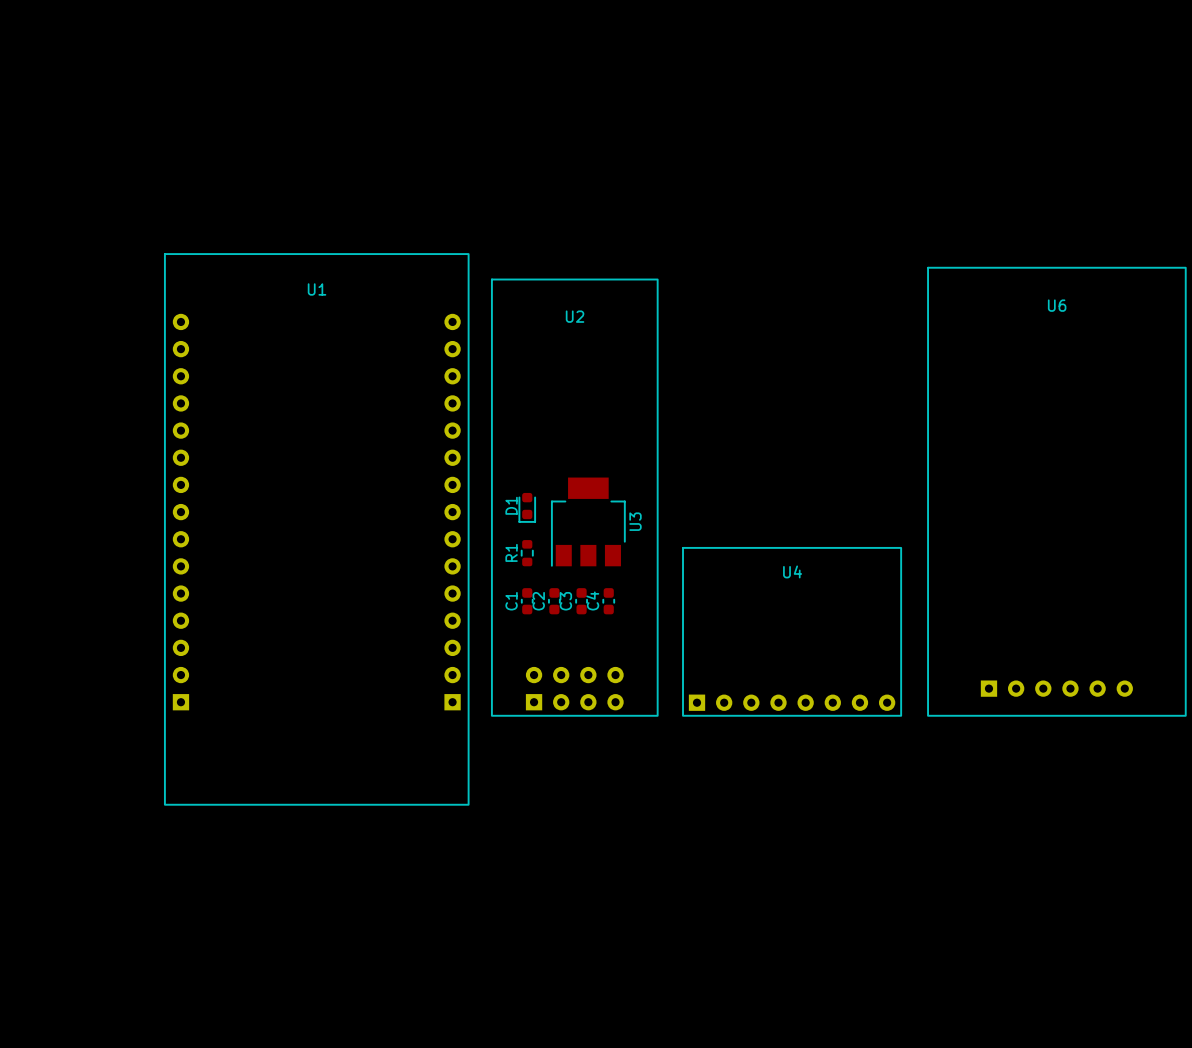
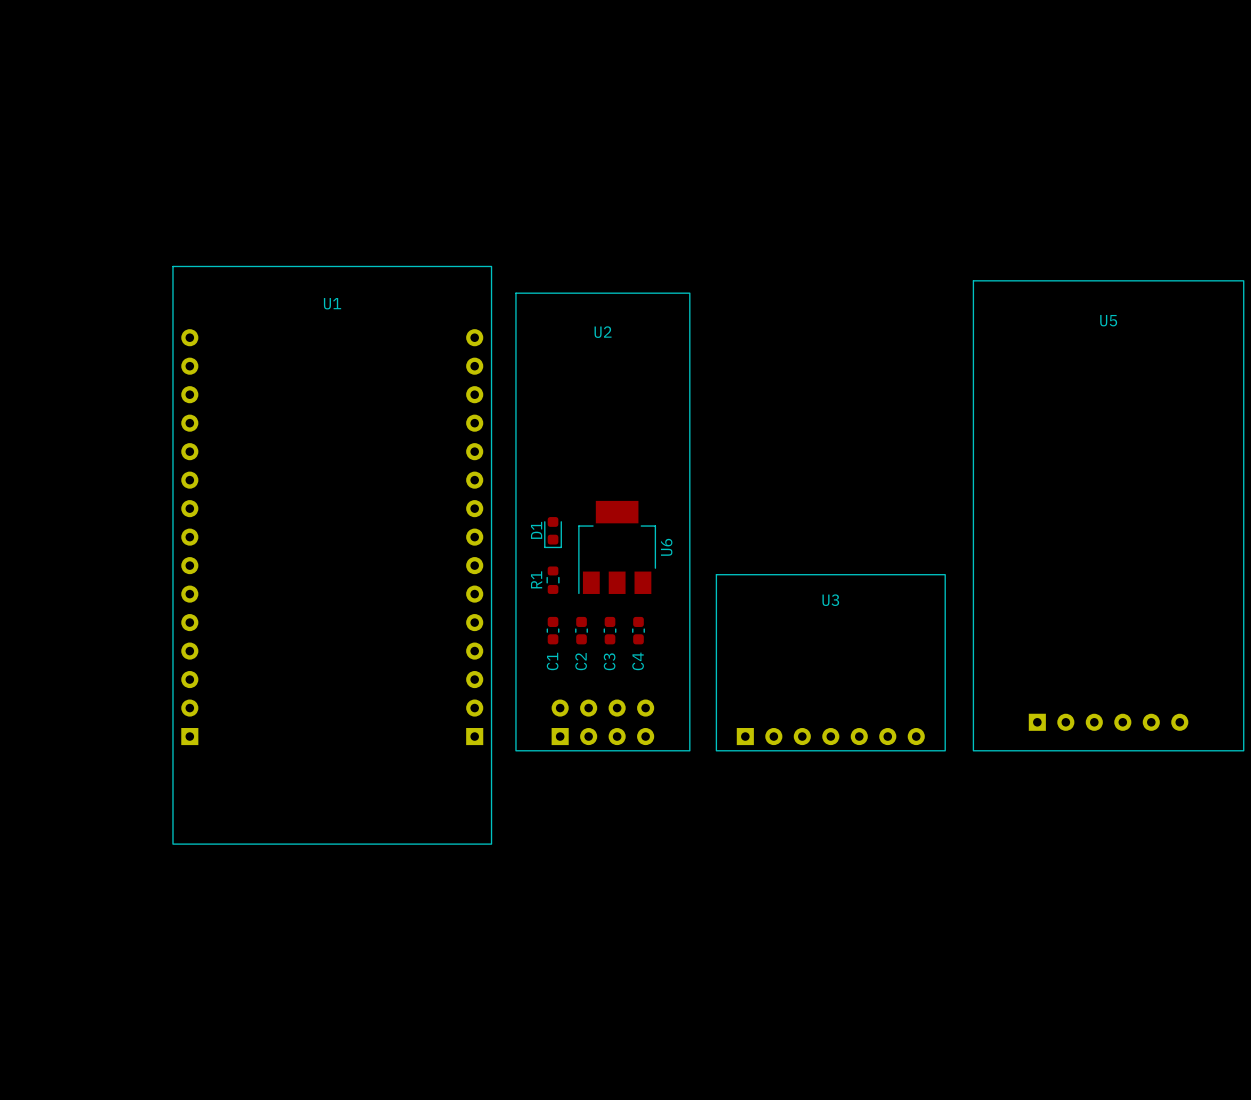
U6 name: U6 (1057, 305) -> U5 (1108, 320)
U3 name: U3 (635, 521) -> U6 (666, 547)
C4 name position: C4 (592, 600) -> C4 (638, 661)
C1 name position: C1 (511, 601) -> C1 (552, 661)
C2 name position: C2 (538, 601) -> C2 (581, 661)
C3 name position: C3 (565, 601) -> C3 (609, 661)
U4: (792, 631) -> none
U3: none -> (830, 662)

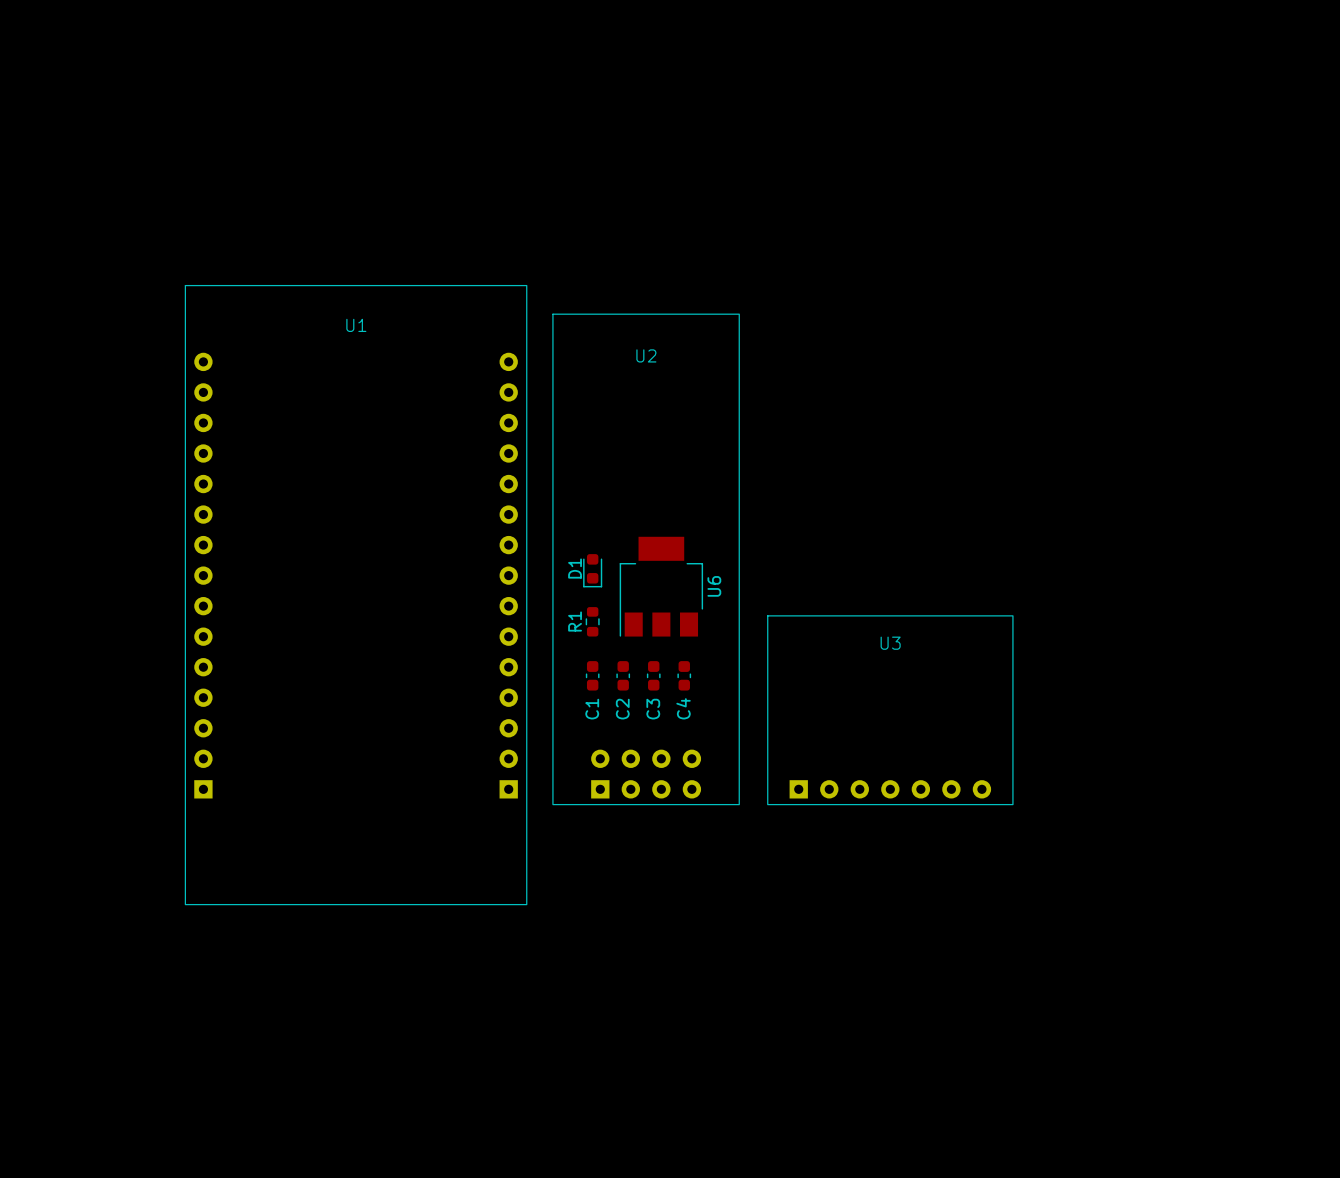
U5: (1108, 515) -> none

